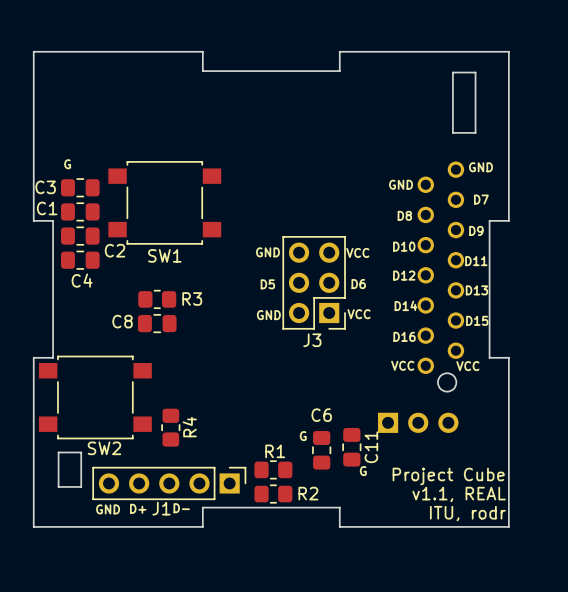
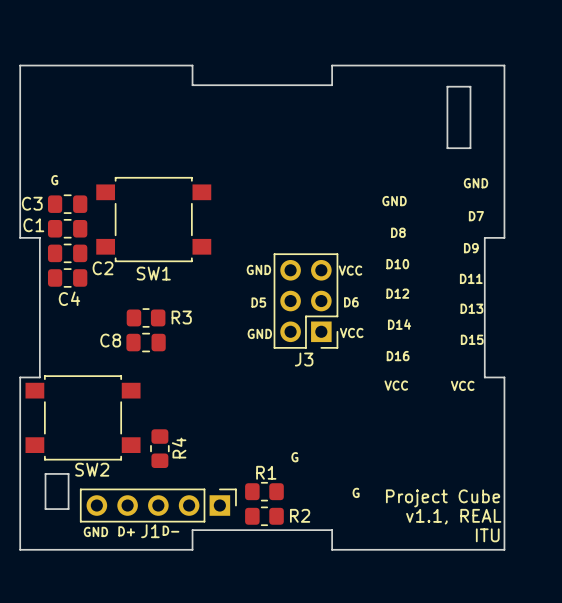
part: (440, 276) -> none
part: (418, 422) -> none
C11: (351, 447) -> none
C6: (321, 450) -> none
text: ITU, rodr (467, 513) -> ITU (487, 535)

